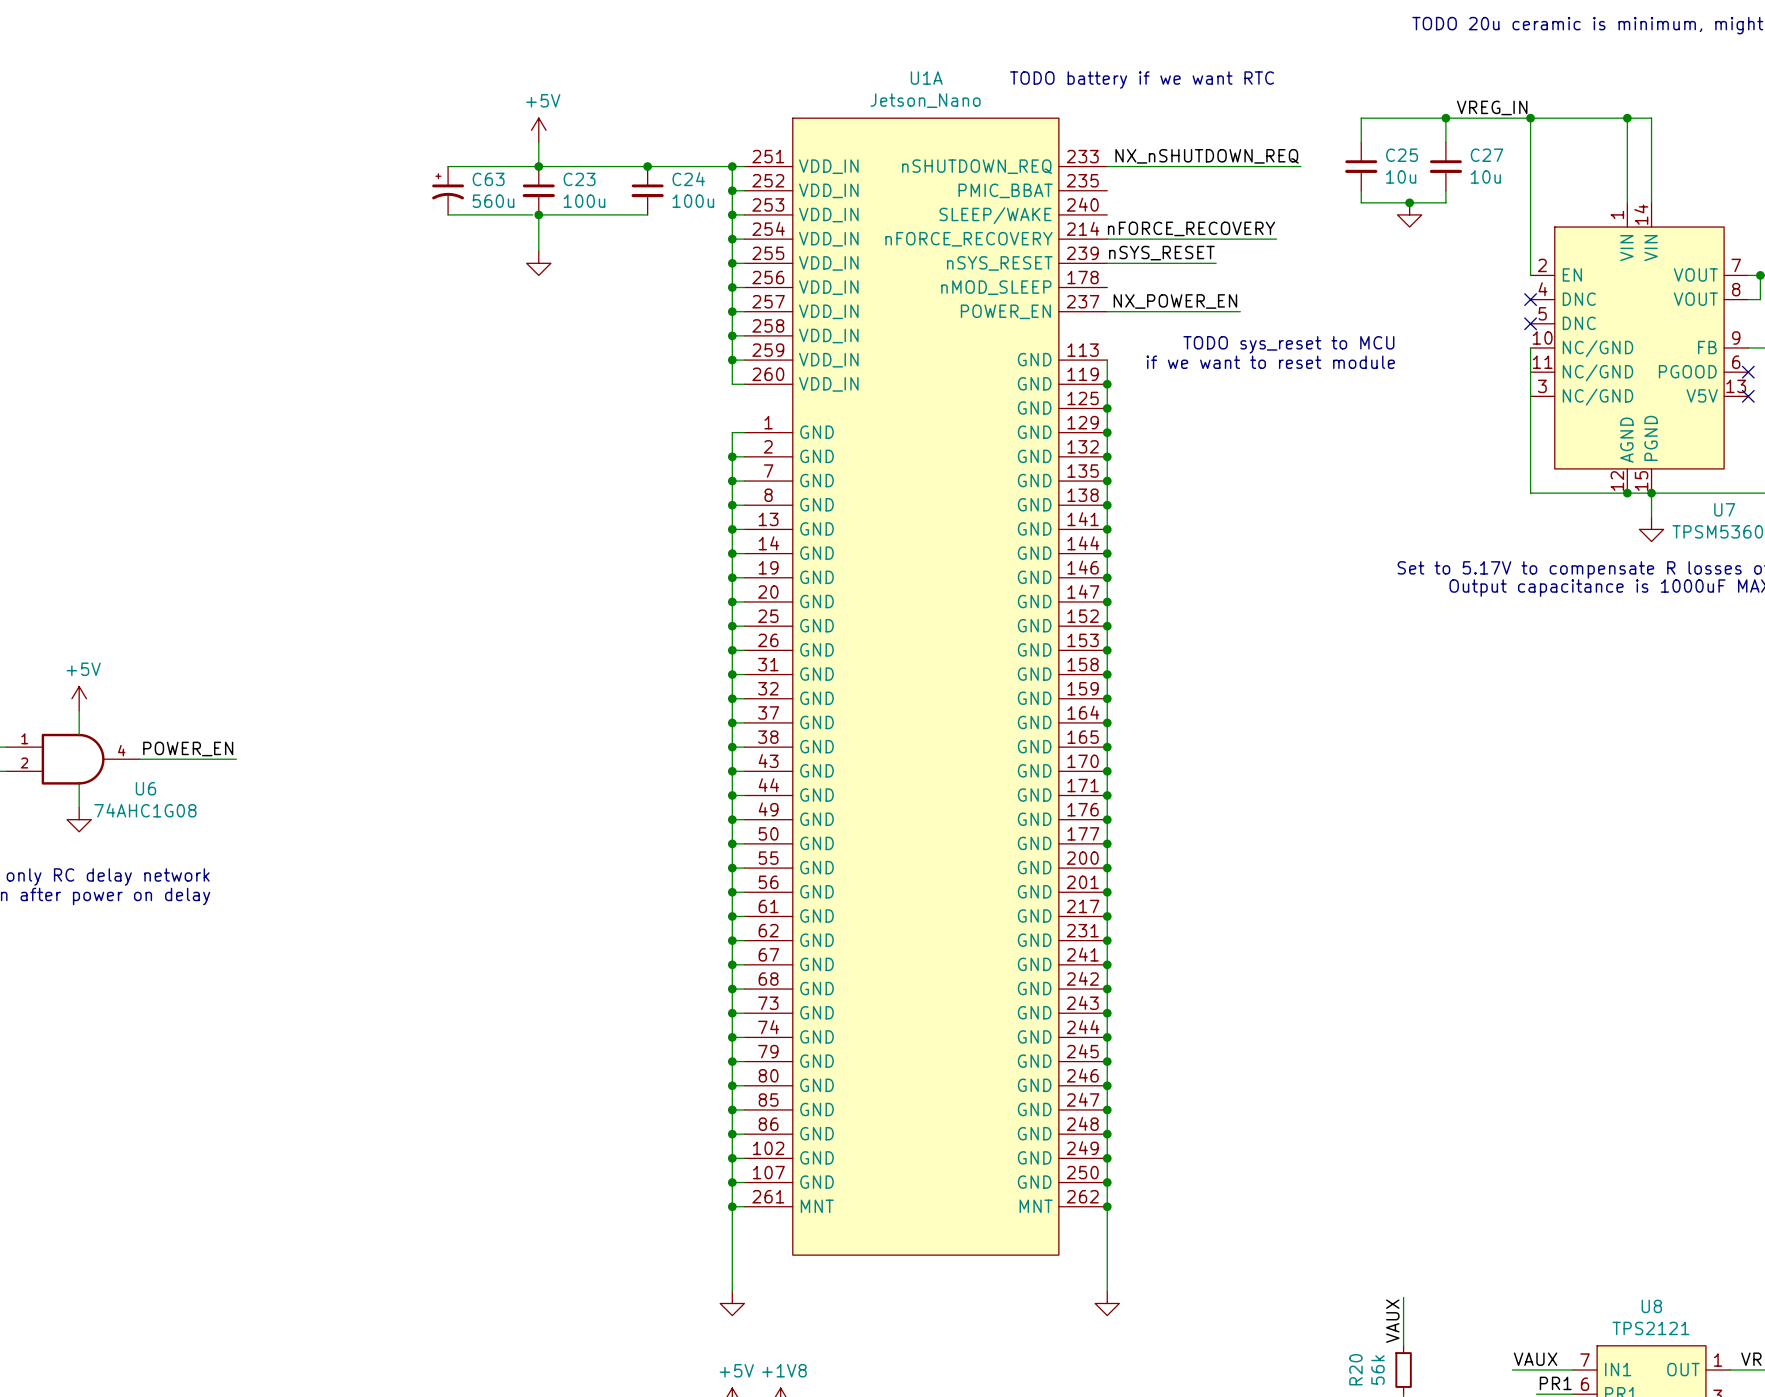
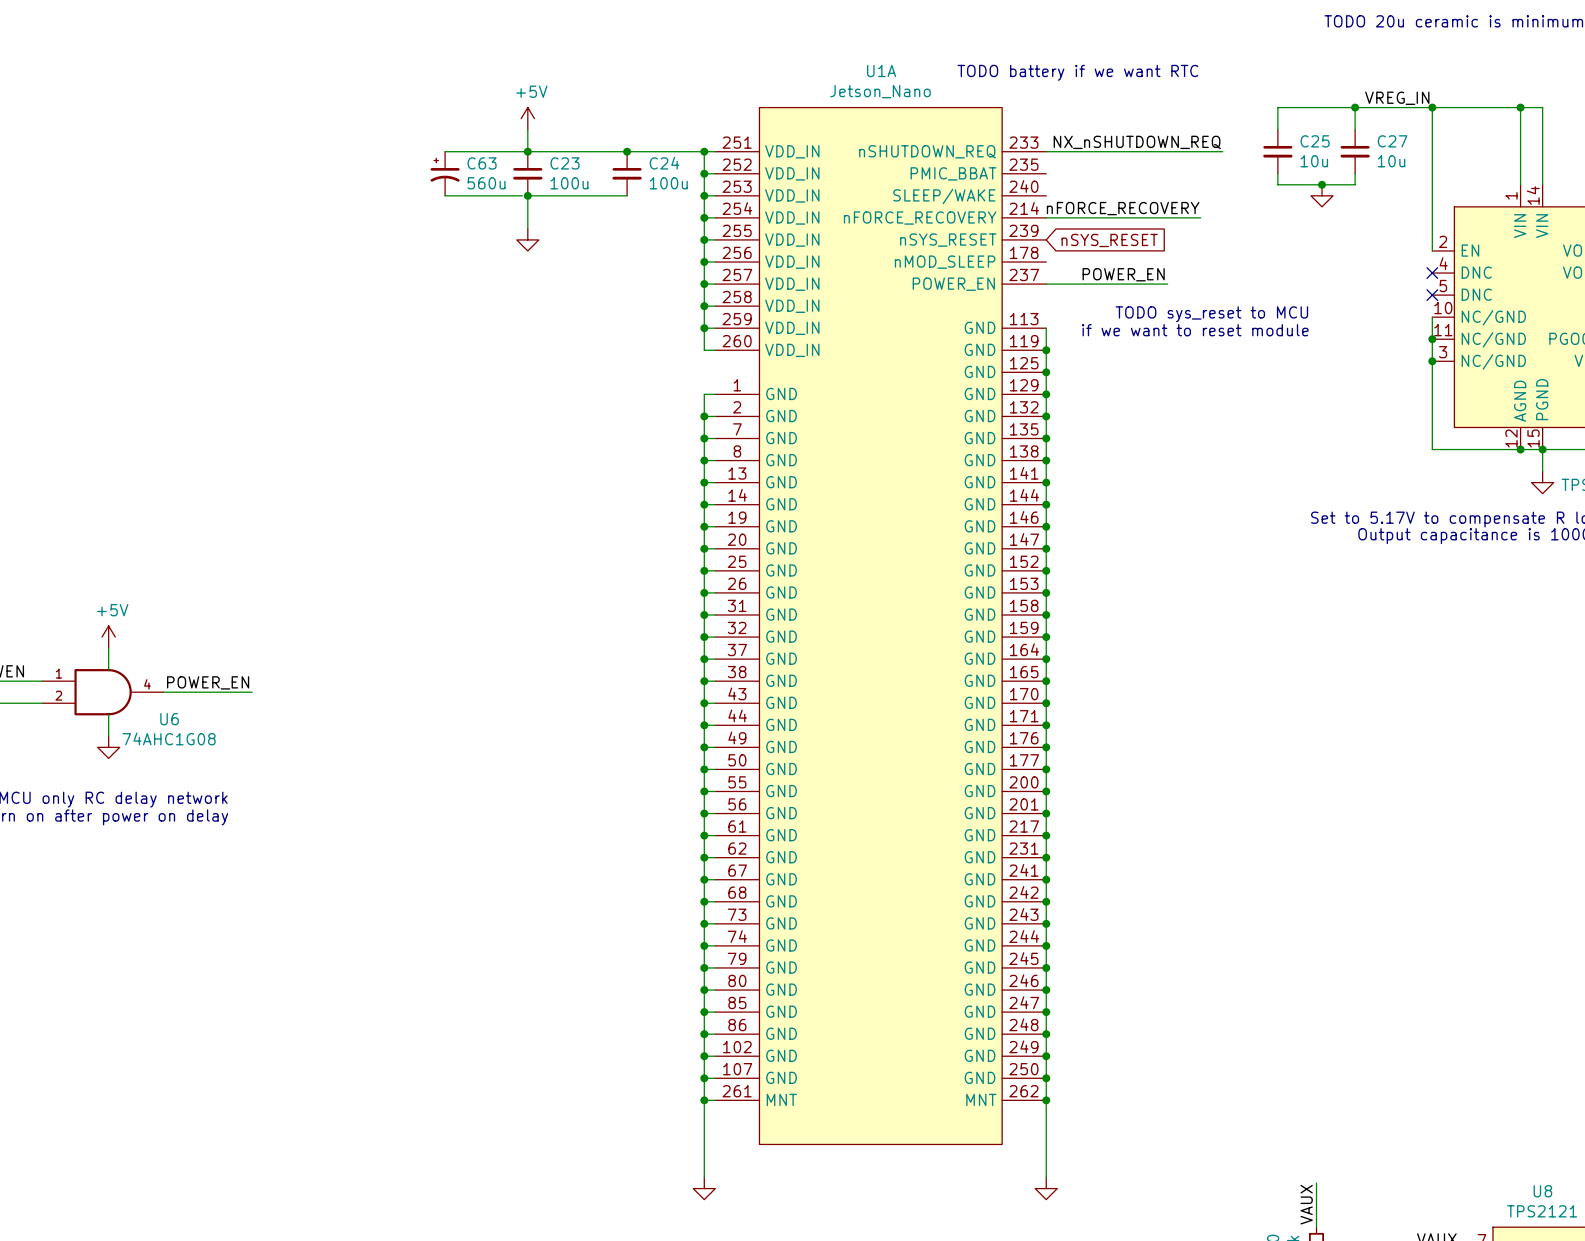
label: nSYS_RESET (1161, 253) -> none
wire: (1107, 263) (1216, 263) -> none
global label: none -> nSYS_RESET (1109, 240)
label: NX_POWER_EN (1175, 301) -> POWER_EN (1123, 274)
junction: none -> (1432, 339)
junction: none -> (1432, 361)

